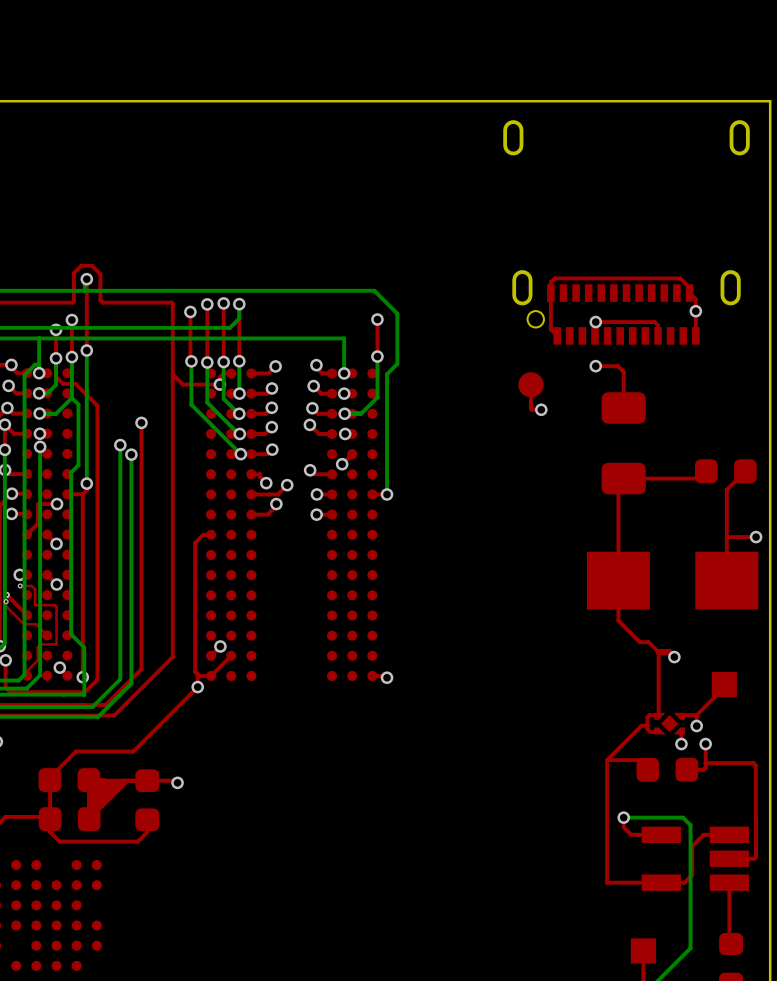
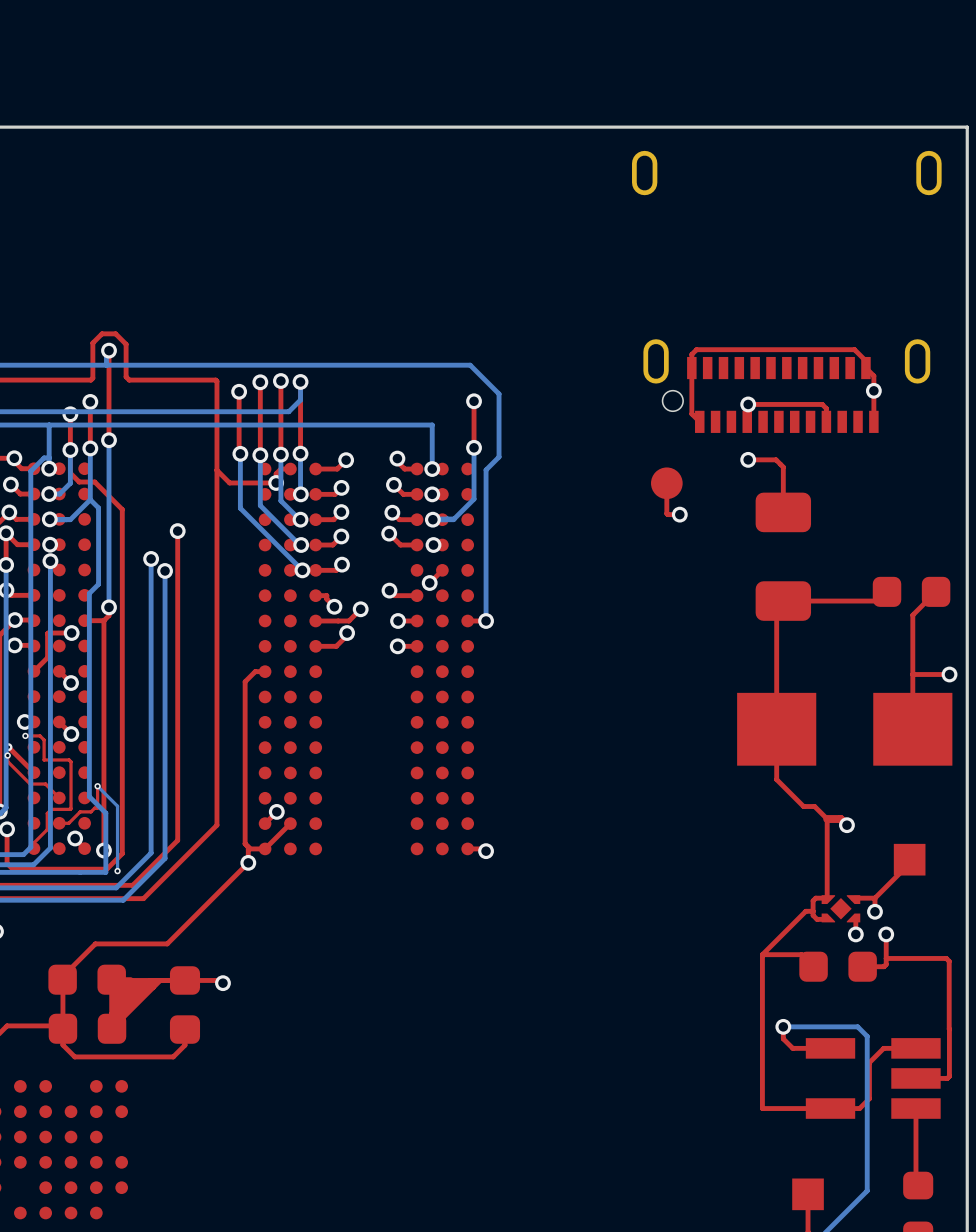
top track: none -> (97, 786) (97, 808) (90, 811) (80, 811) (68, 823) (59, 823)
bottom track: none -> (97, 786) (117, 806) (117, 871)
via: none -> (97, 786)
via: none -> (117, 871)

